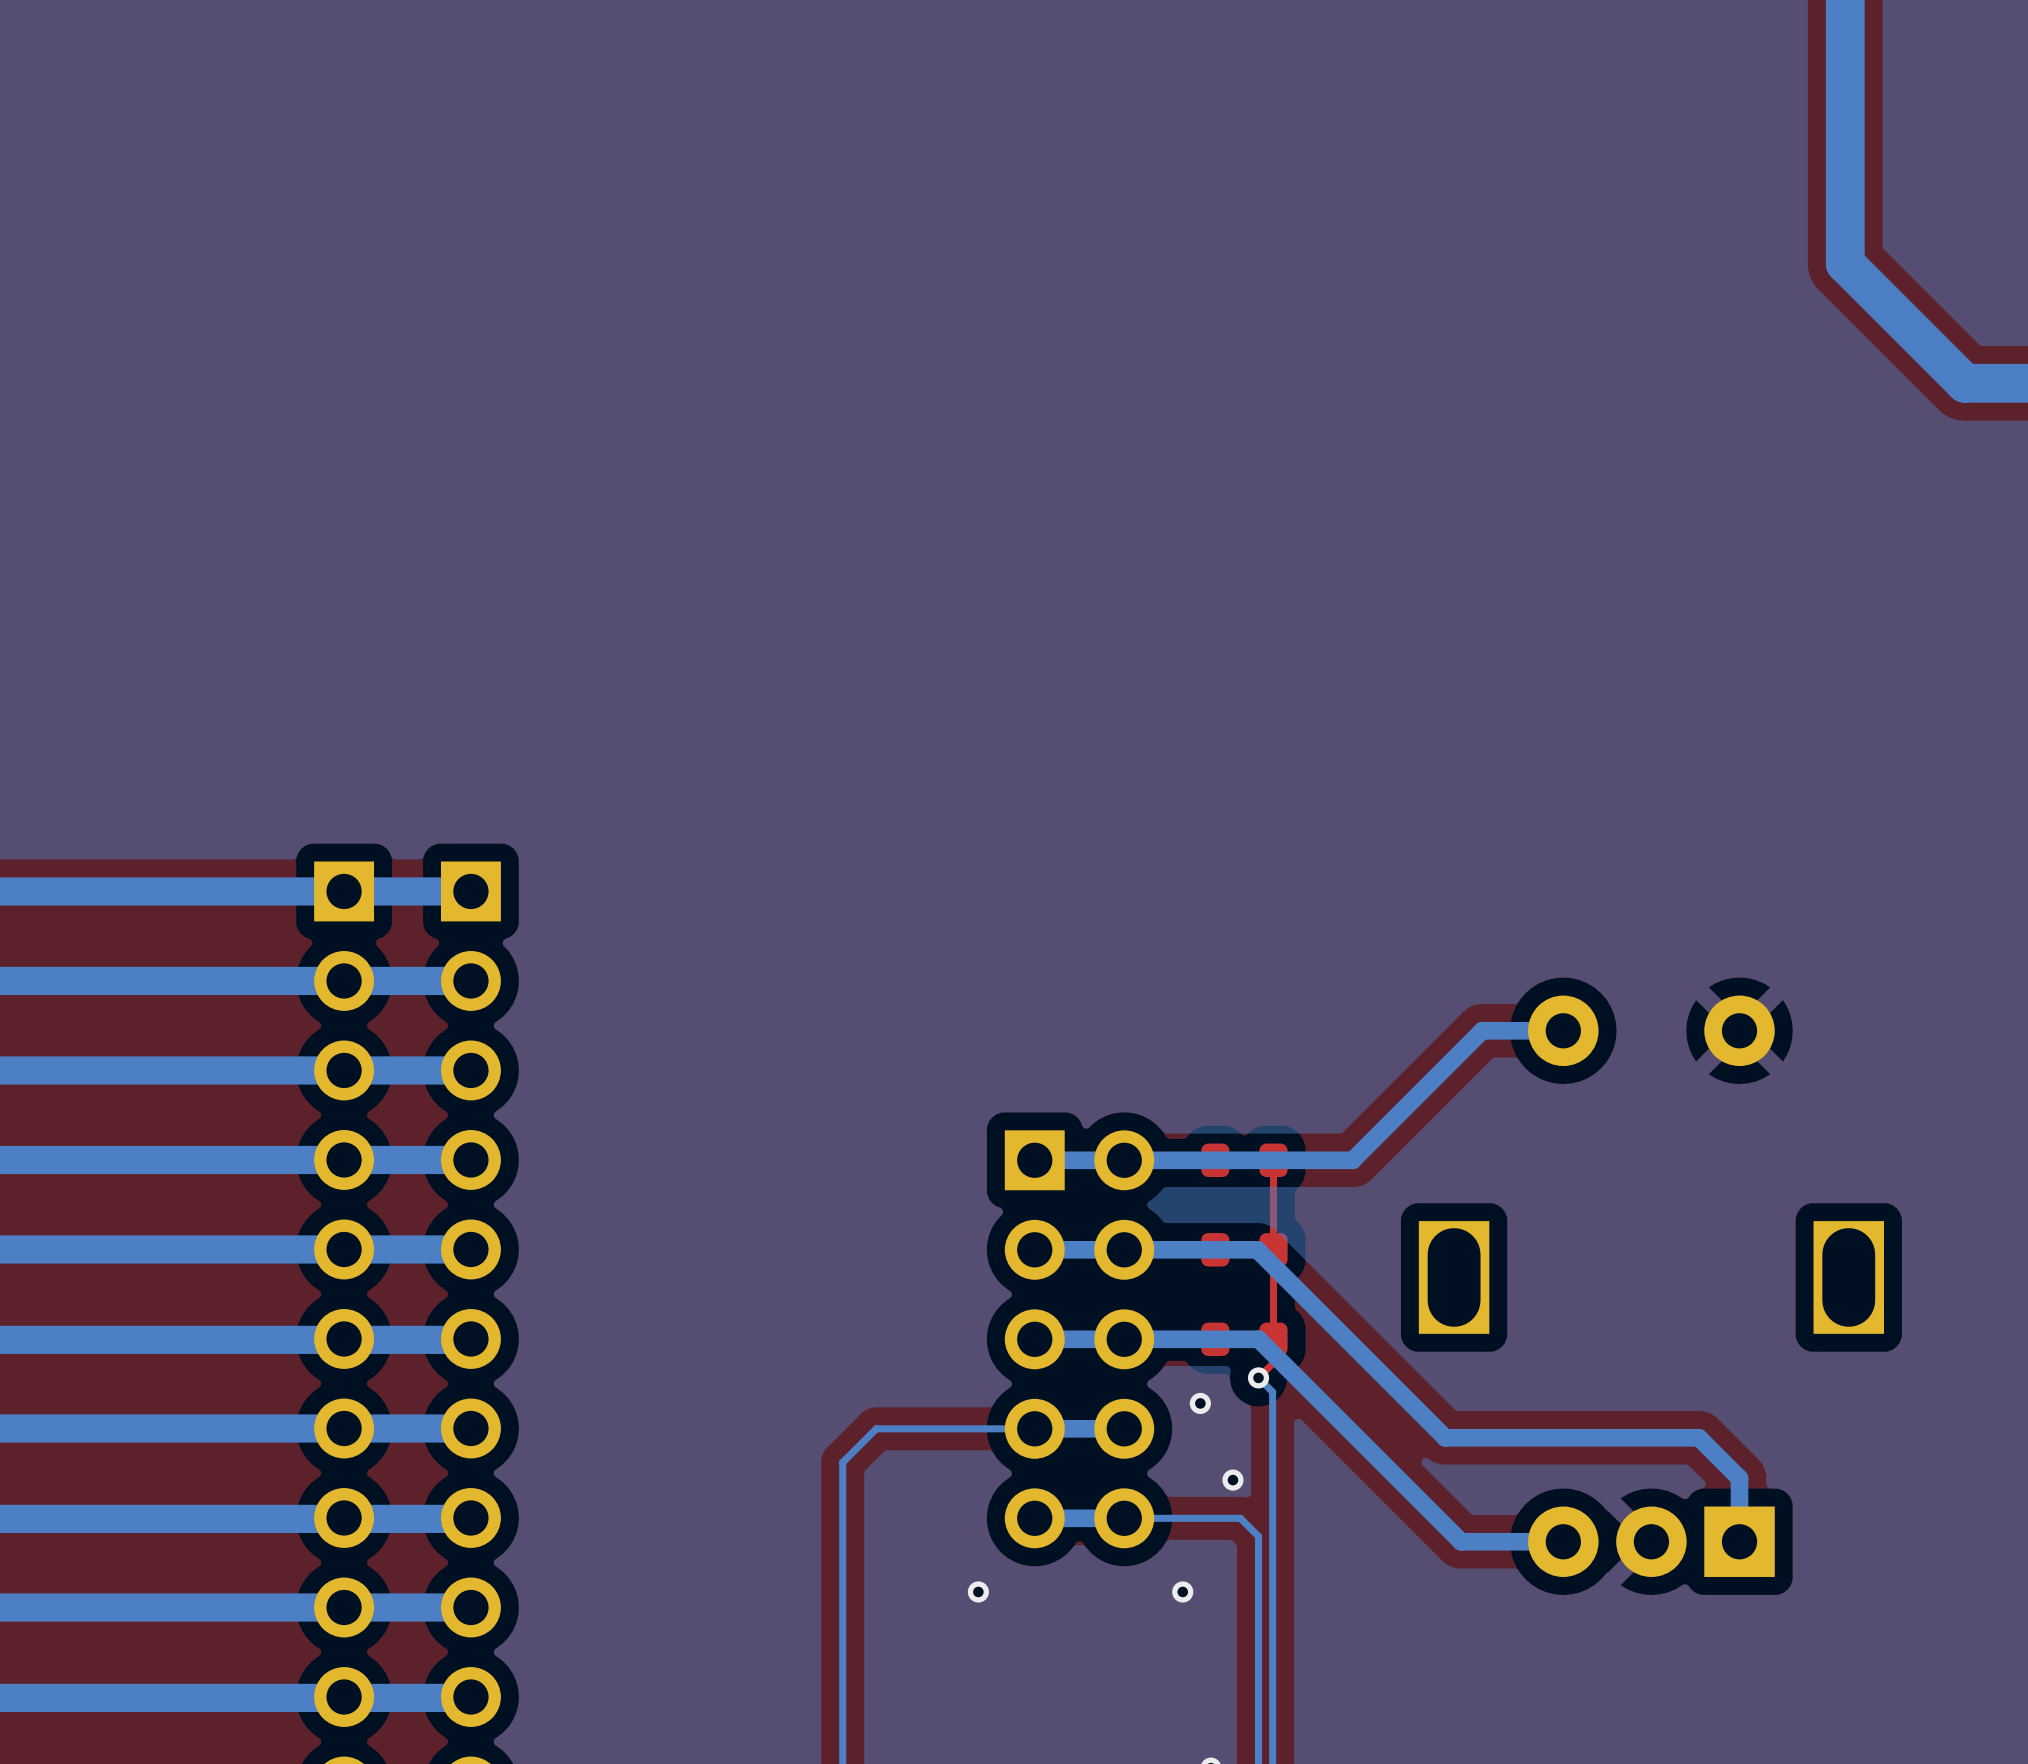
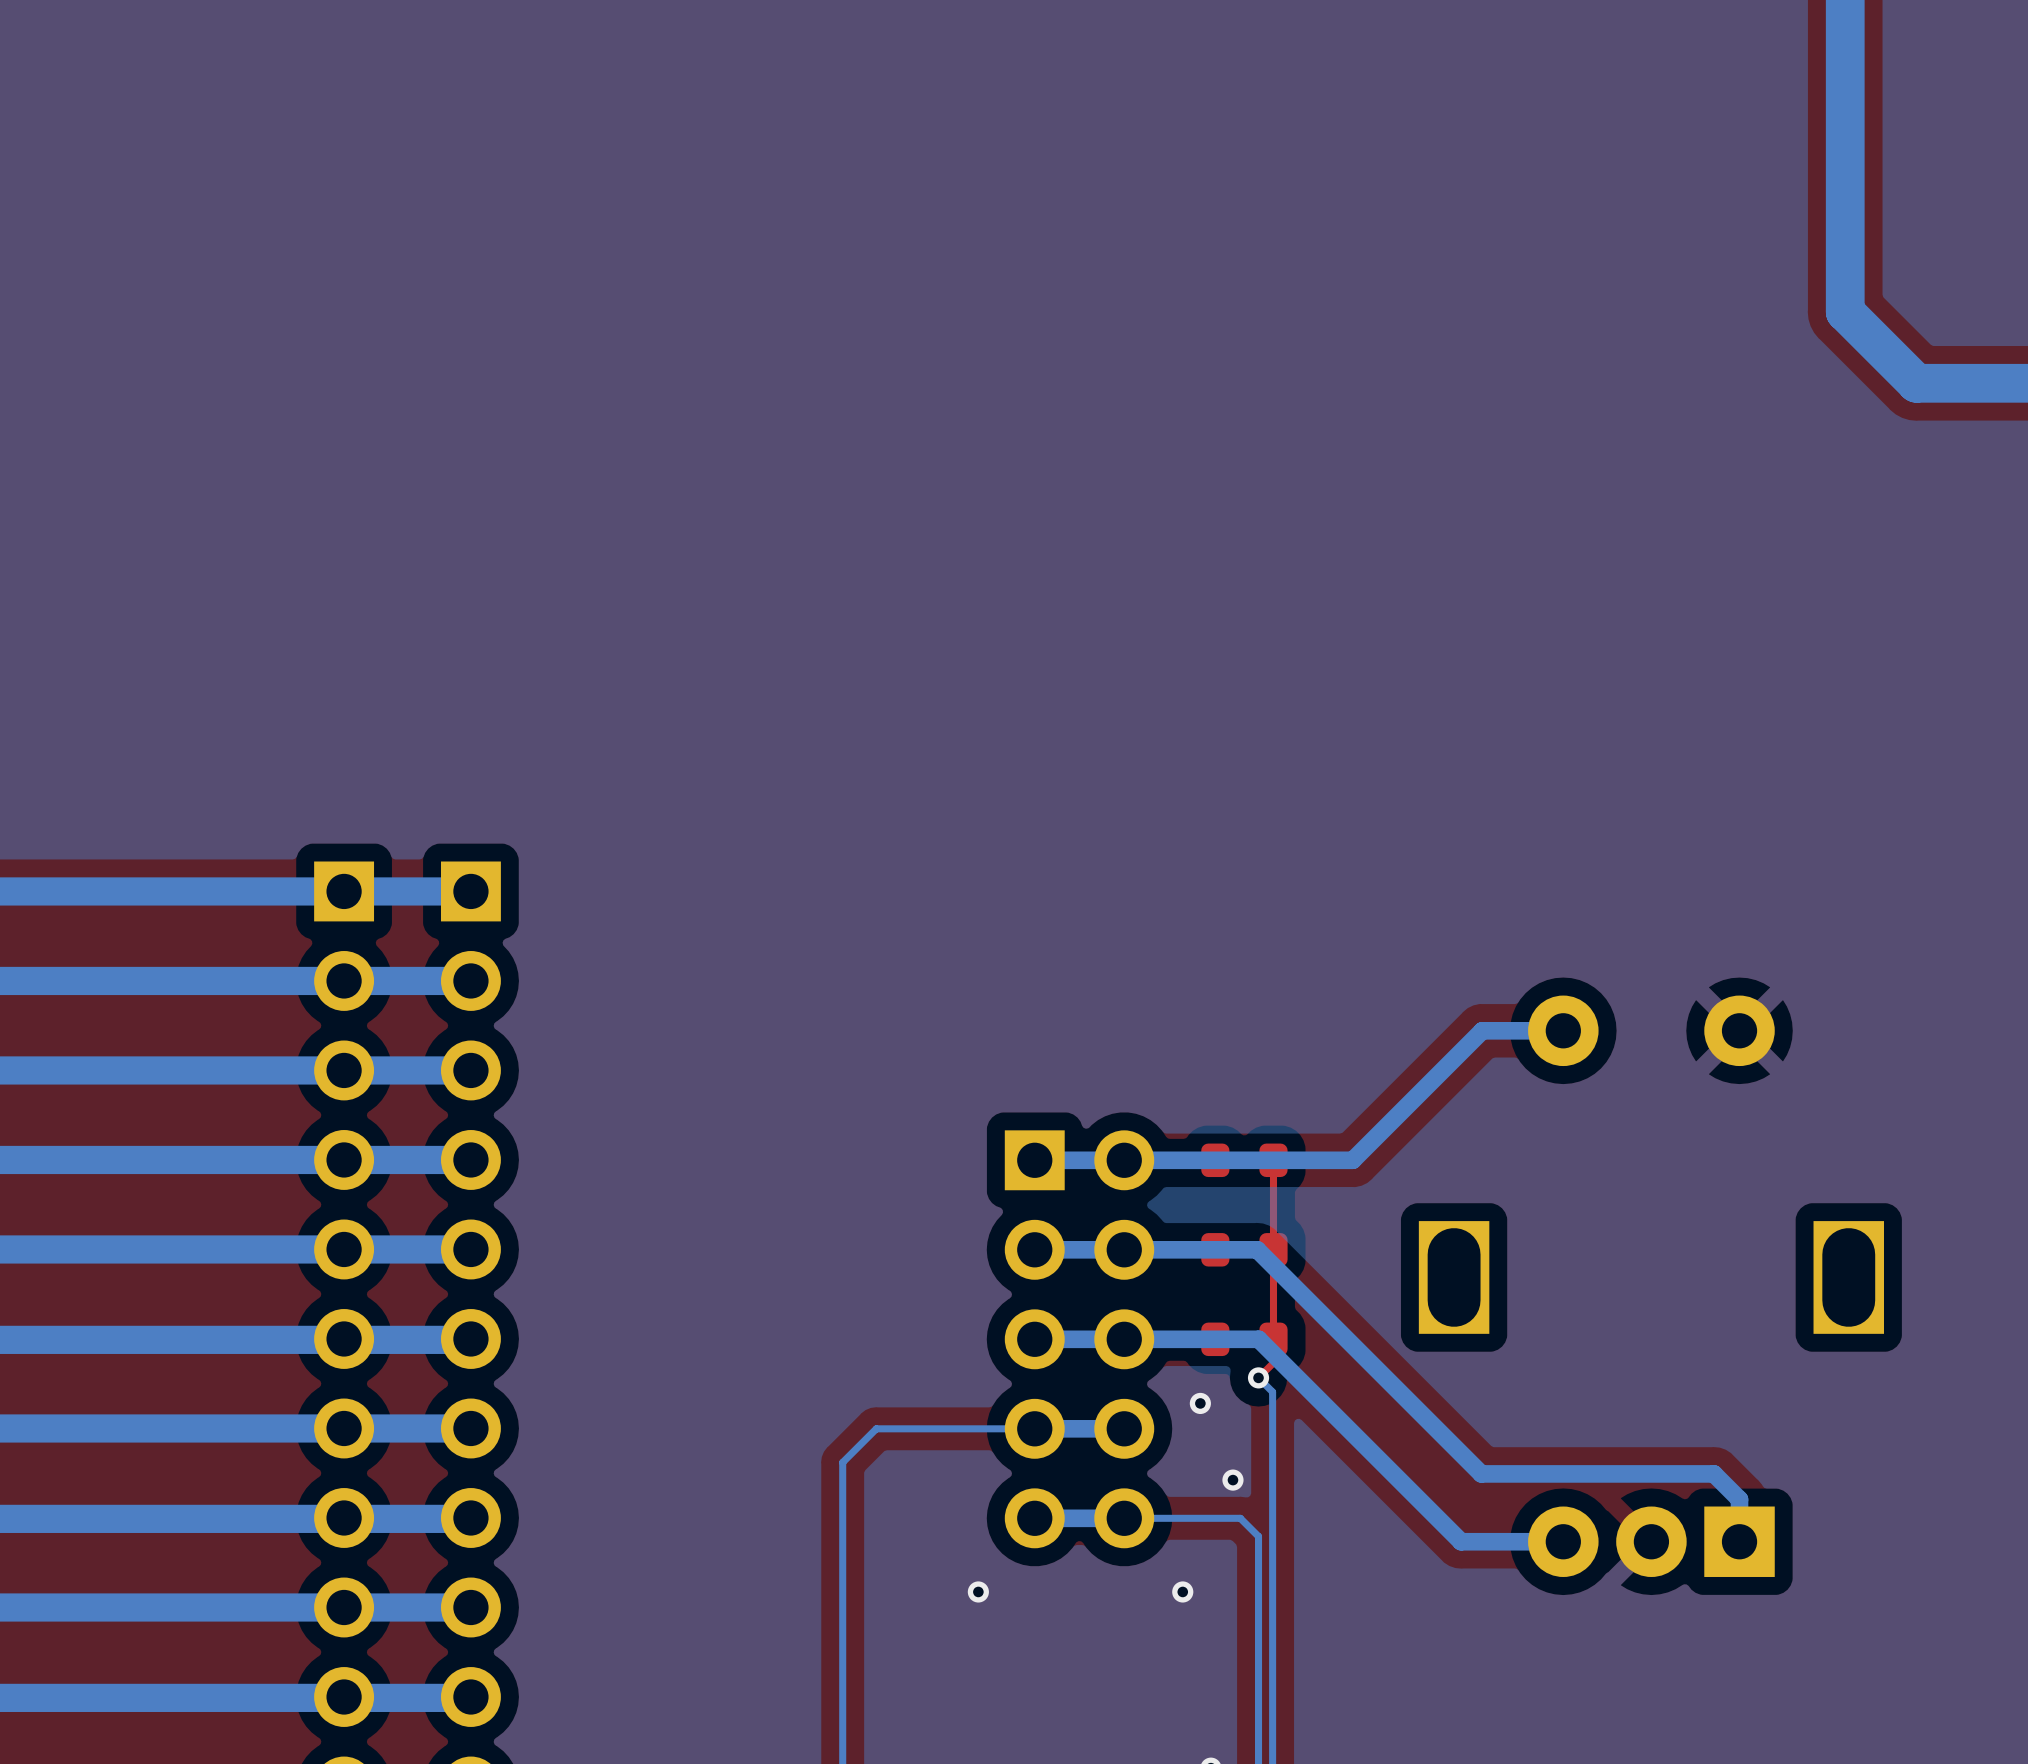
bottom track: (1845, 263) (1965, 383) -> (1845, 263) (1845, 311) (1916, 383) (1965, 383)
bottom track: (1445, 1437) (1698, 1437) (1739, 1478) (1739, 1499) -> (1445, 1437) (1481, 1473) (1713, 1473) (1739, 1499)

